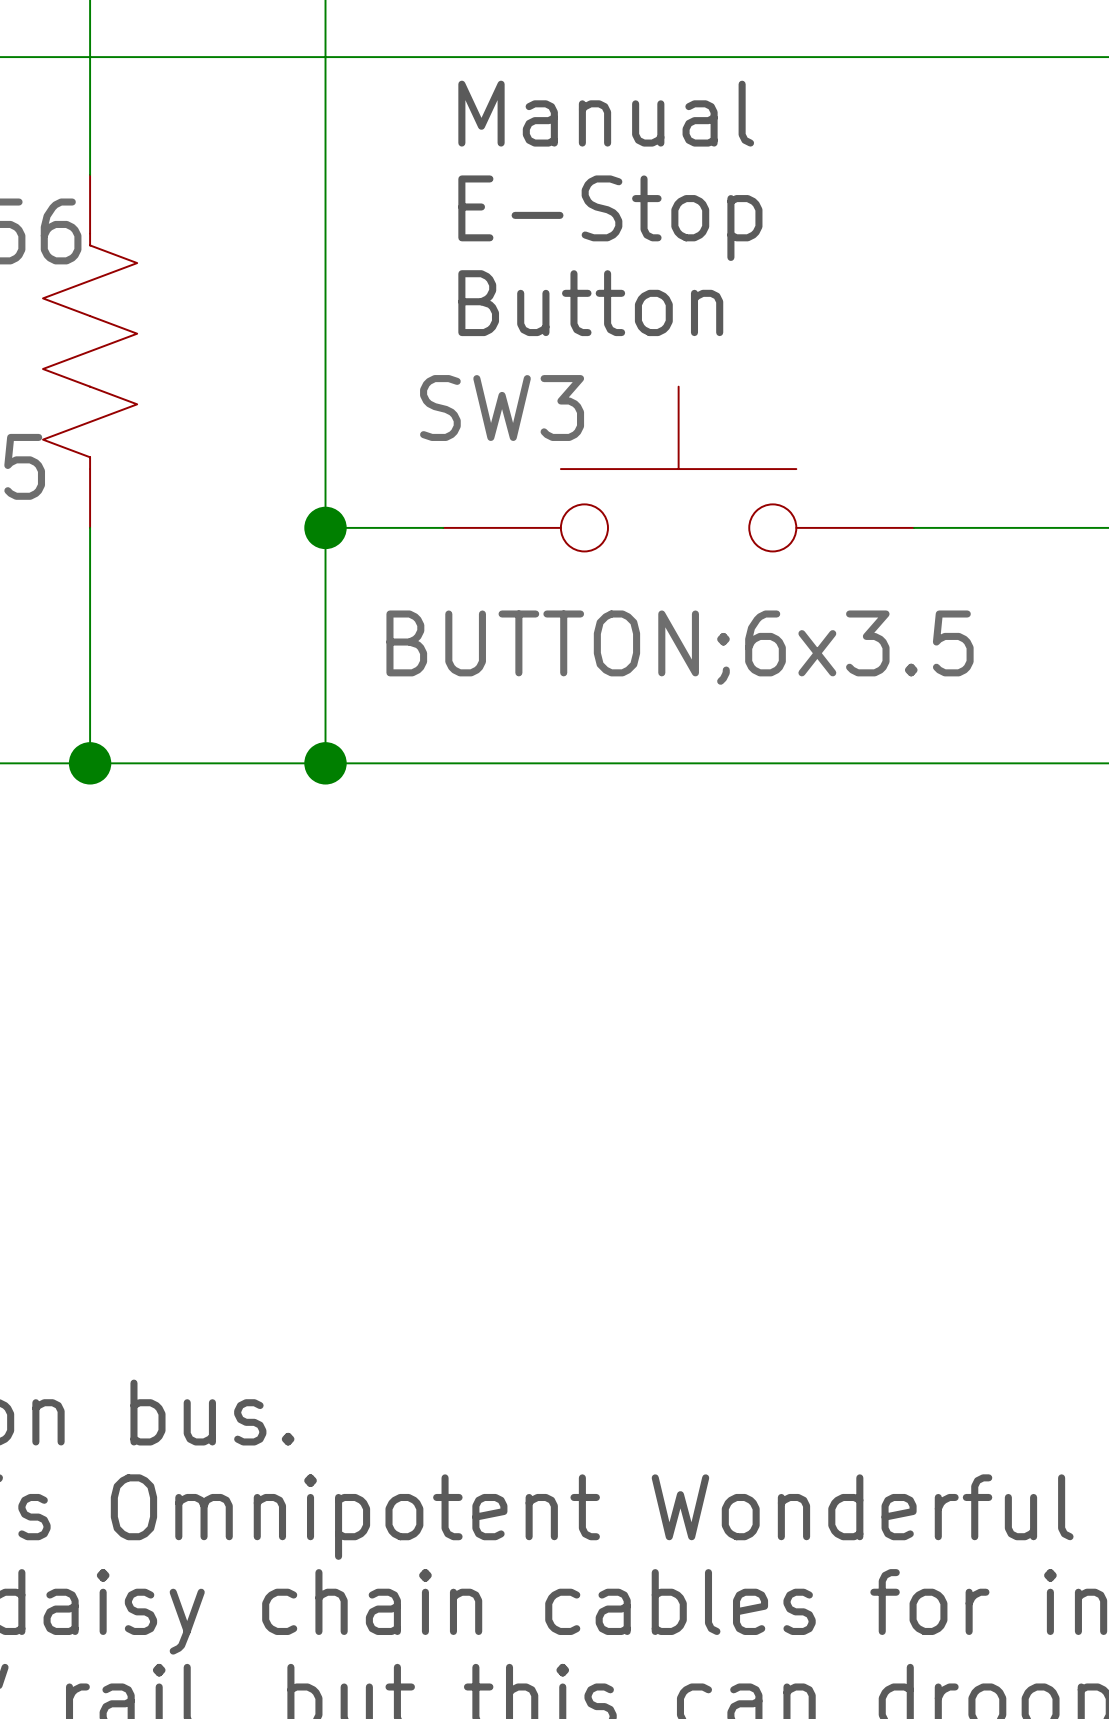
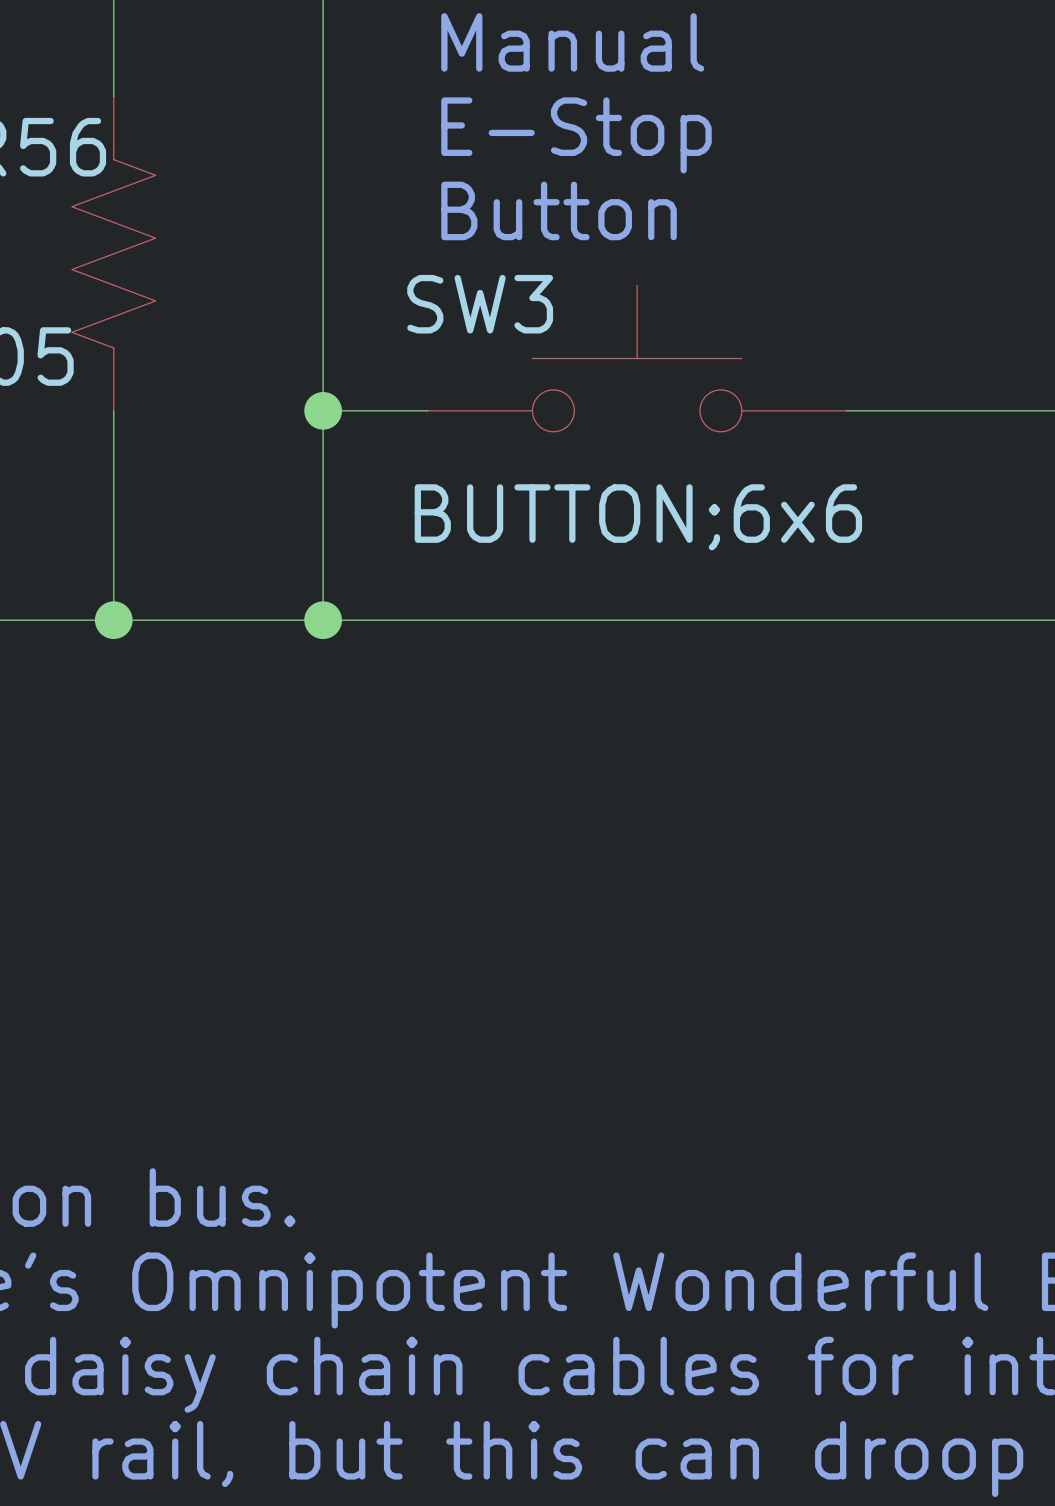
SW3 value: BUTTON;6x3.5 (680, 647) -> BUTTON;6x6 (638, 517)

